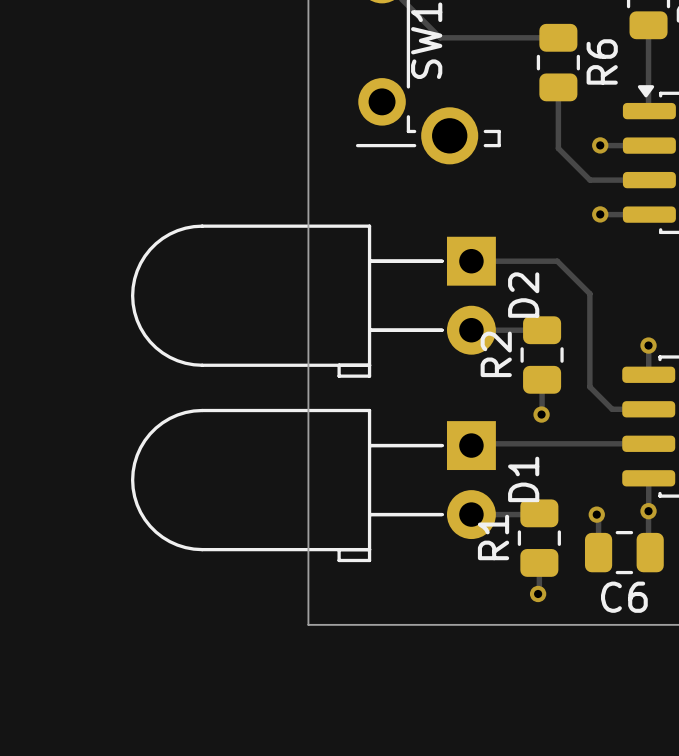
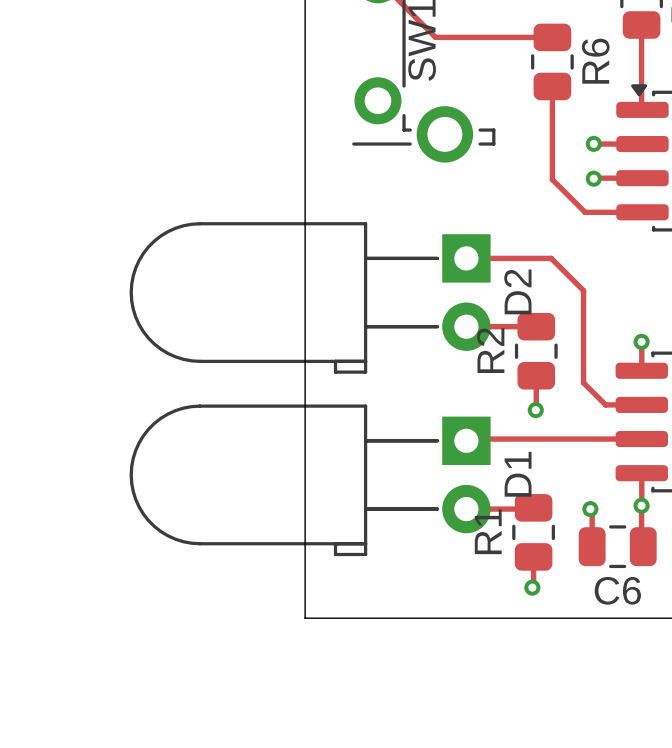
track: (558, 148) (590, 180) (600, 180) -> (552, 146) (552, 179) (585, 212) (593, 212)
via position: (600, 214) -> (593, 178)

